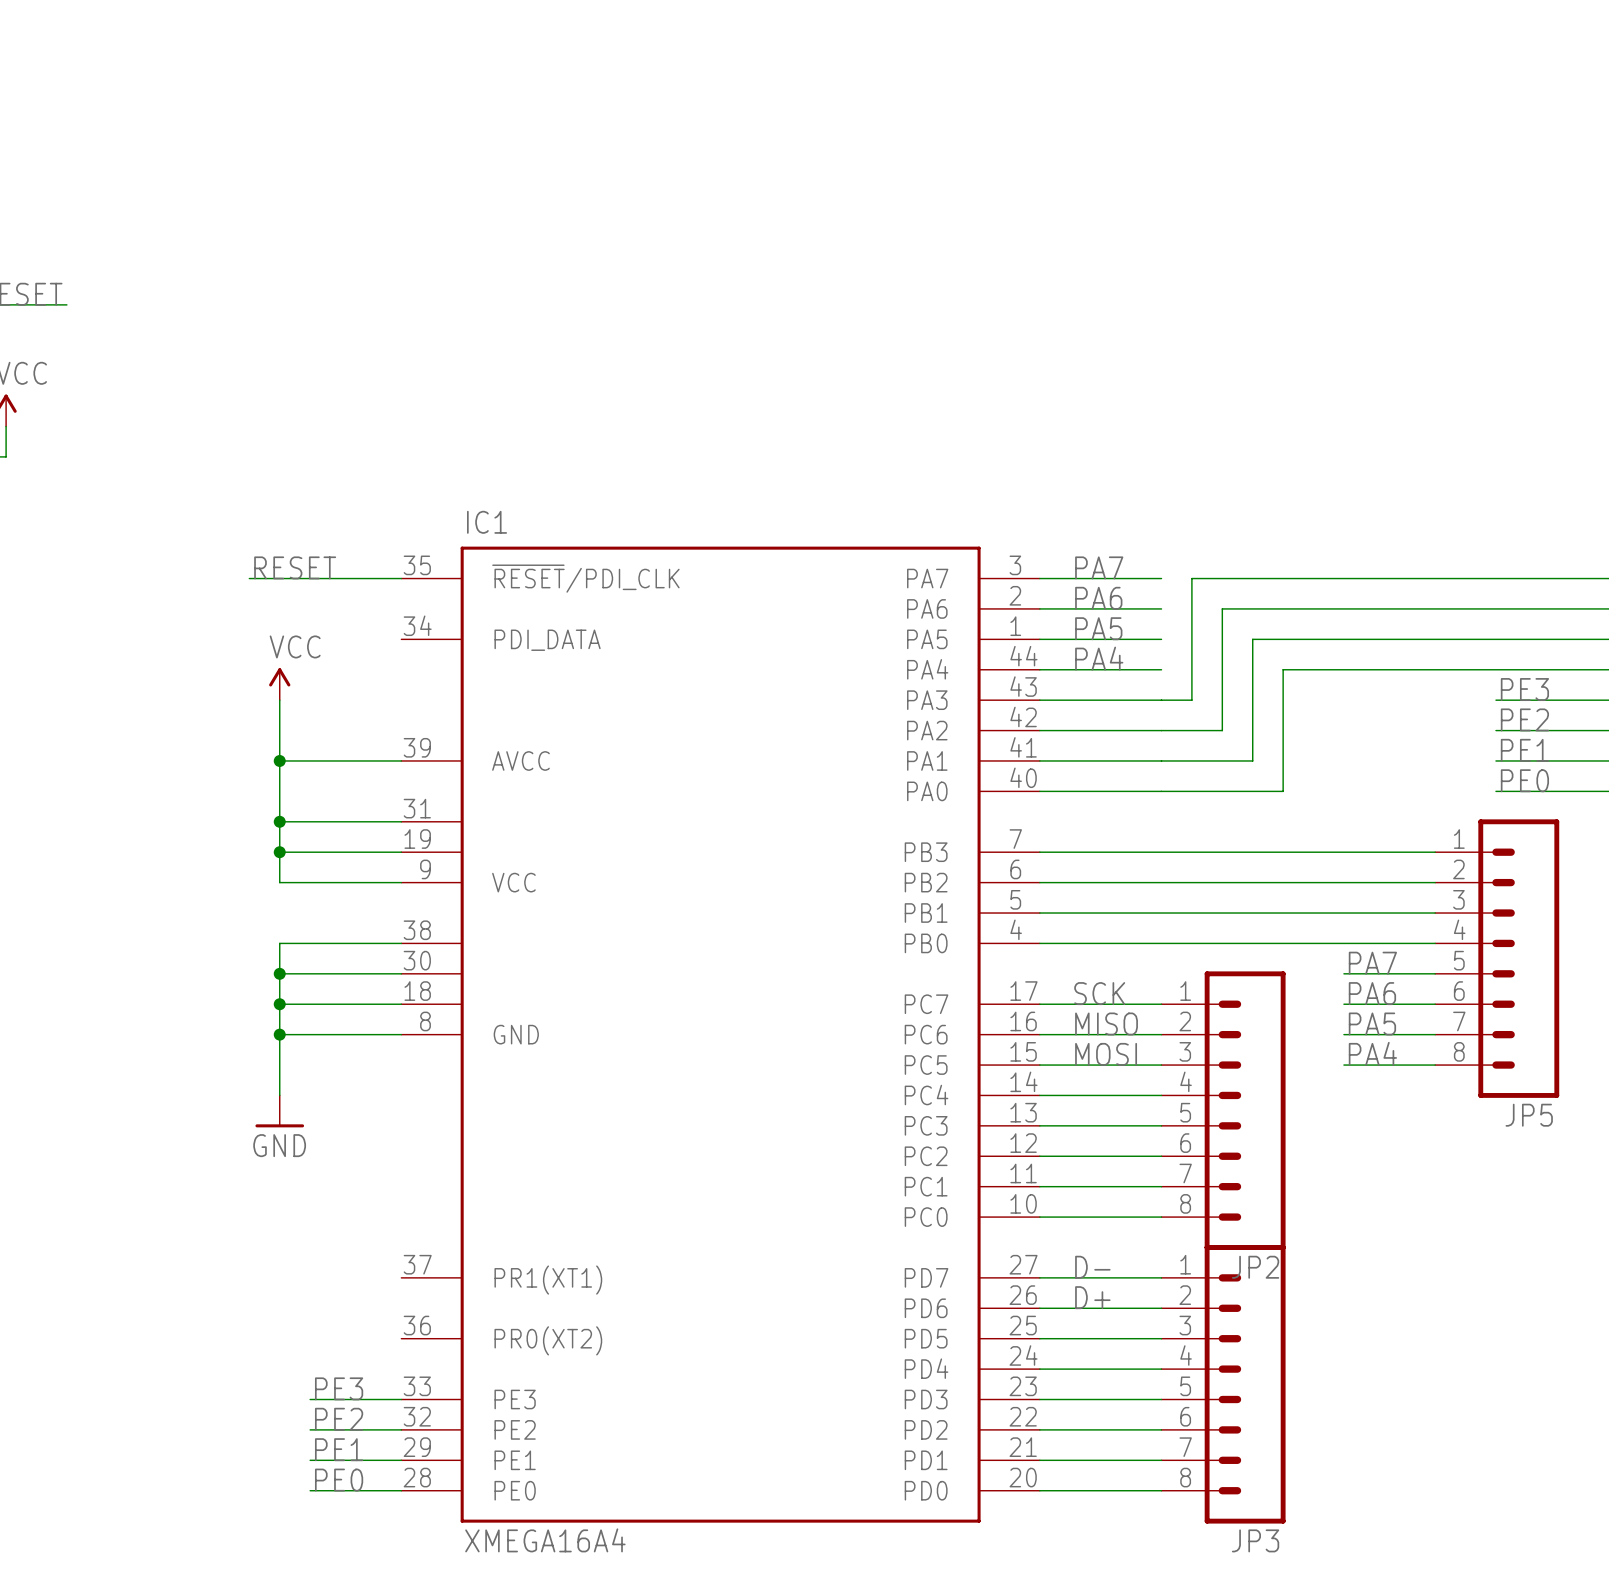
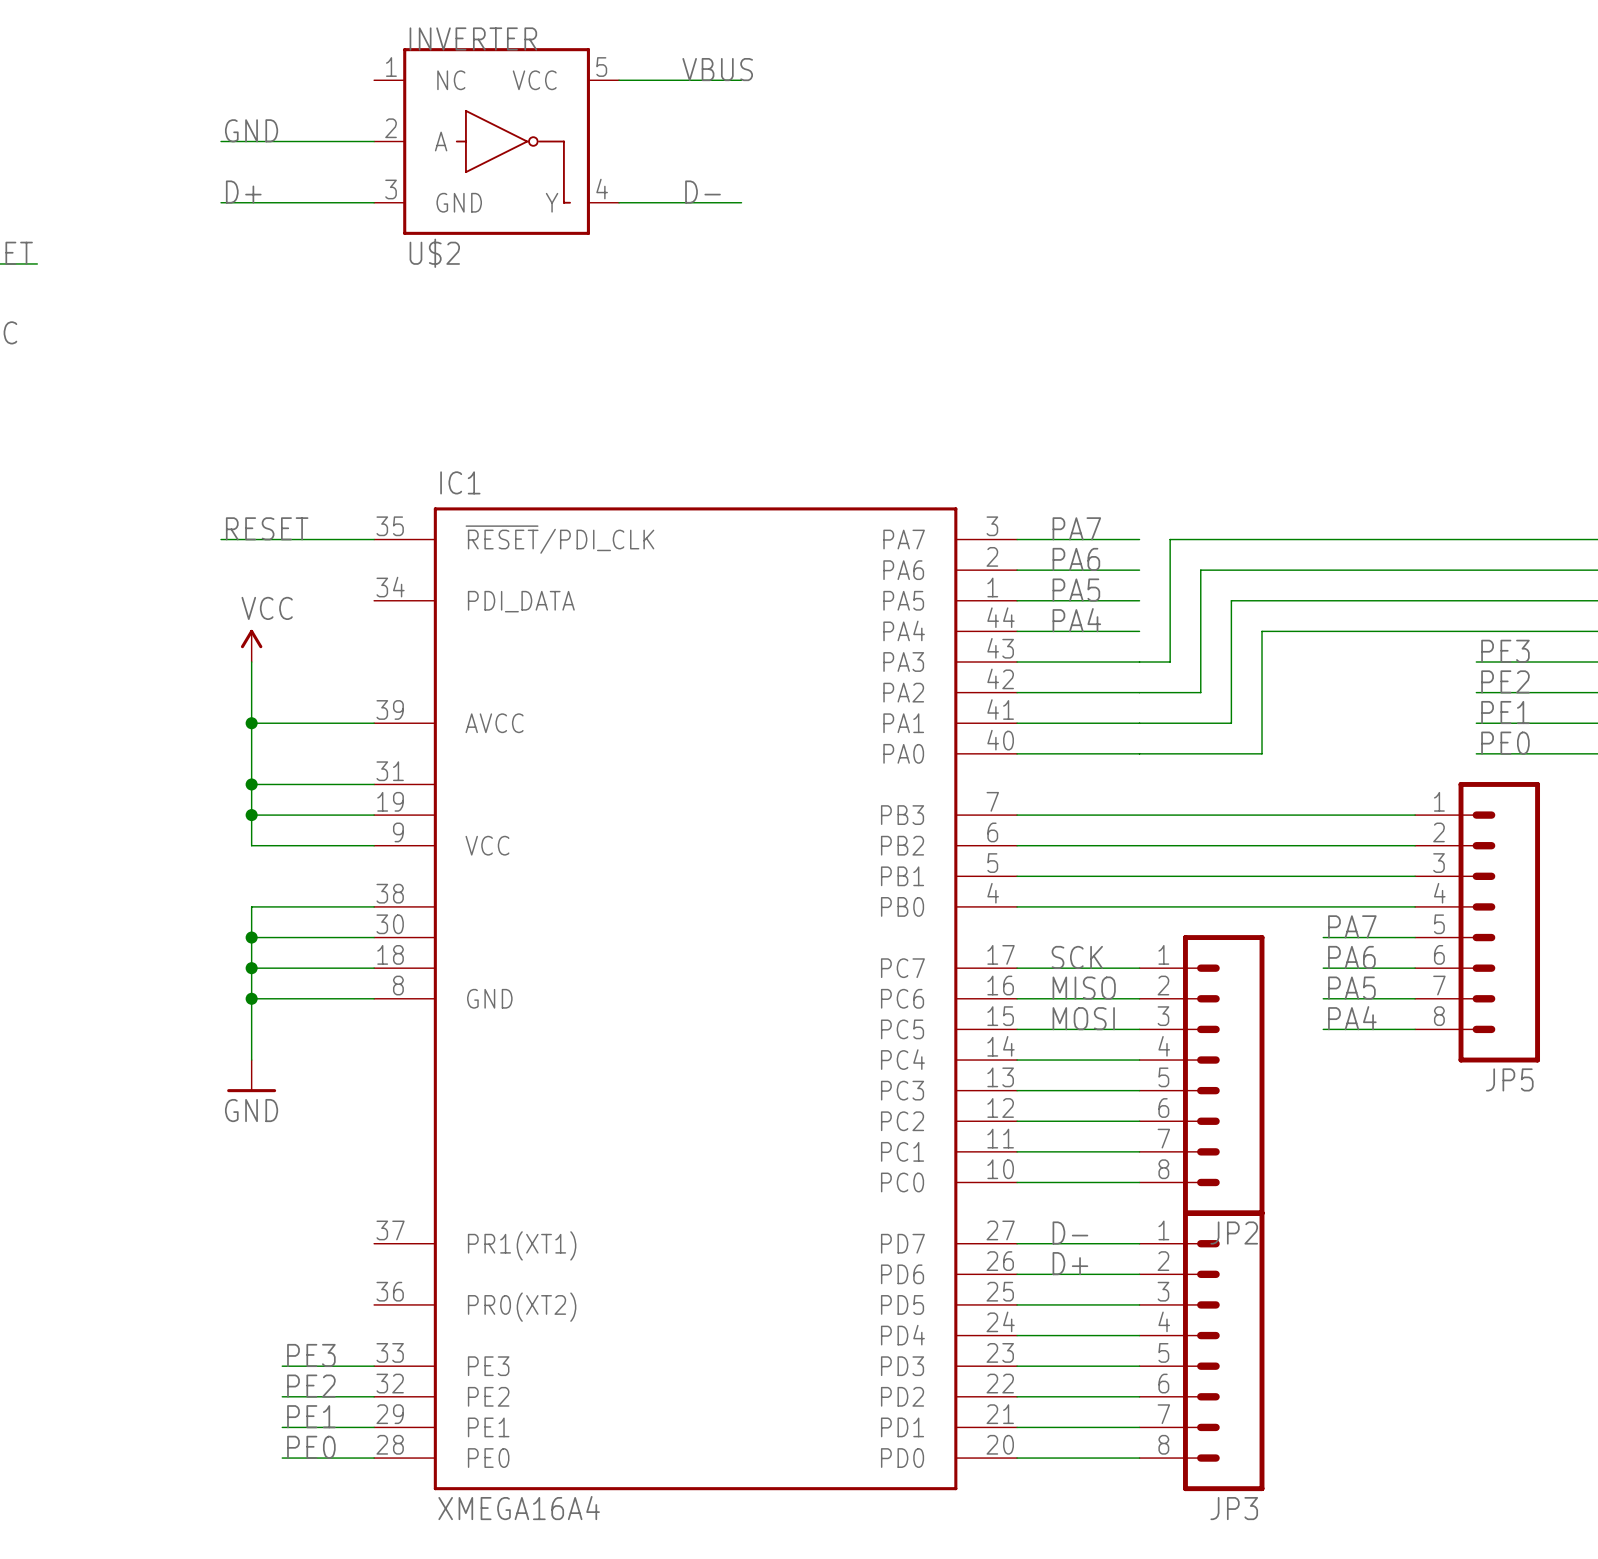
label: none -> VBUS (717, 69)
wire: none -> (619, 80) (741, 80)
label: none -> GND (251, 130)
wire: none -> (221, 141) (374, 141)
U$2: none -> INVERTER (496, 141)
label: none -> D+ (243, 192)
label: none -> D- (702, 192)
wire: none -> (221, 202) (374, 202)
wire: none -> (619, 202) (741, 202)

